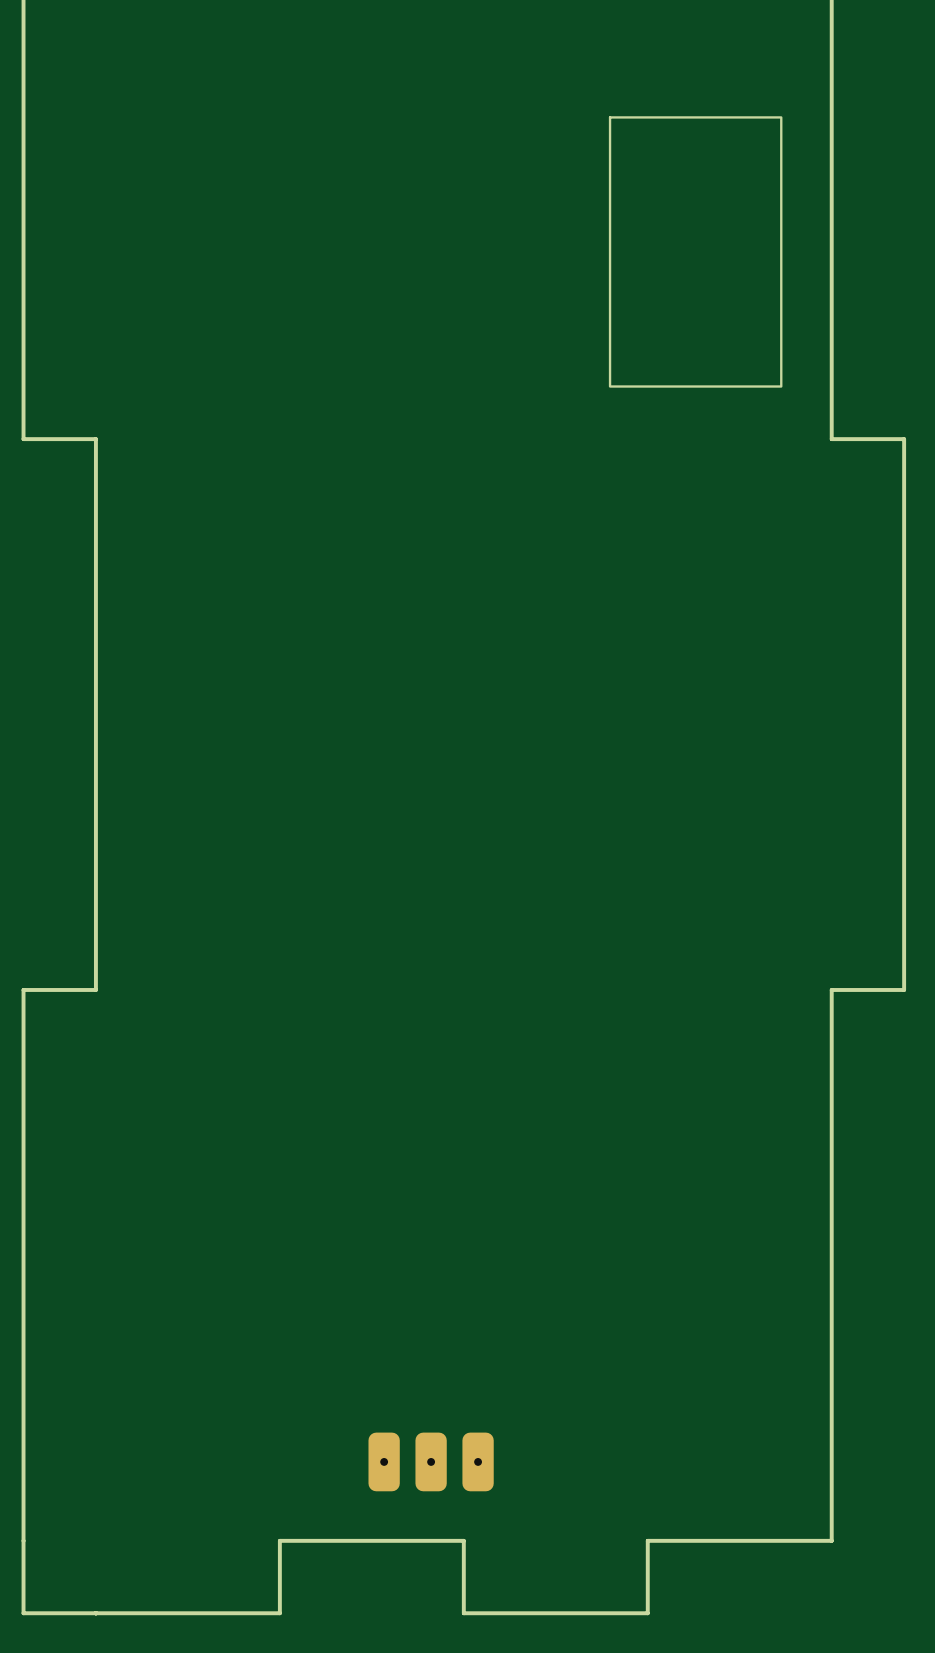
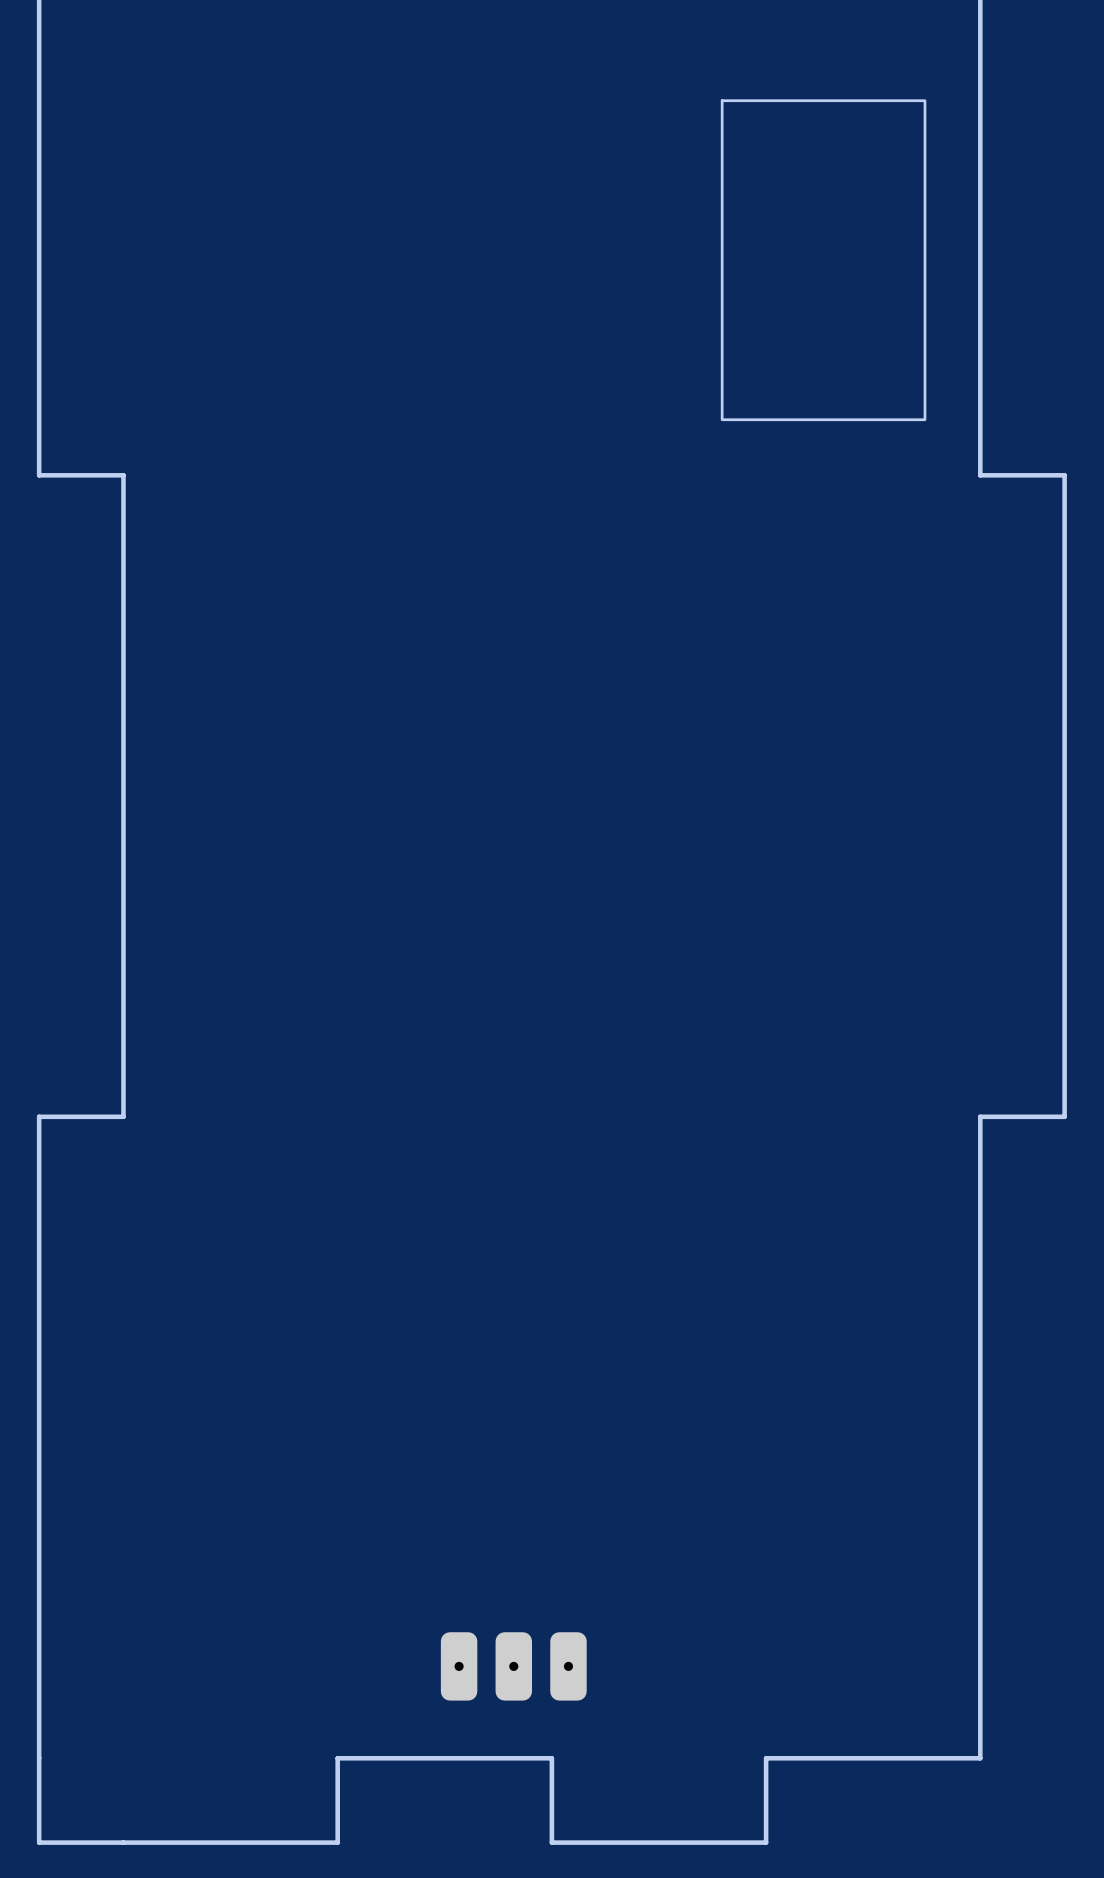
part footprint: [608, 116, 783, 388] -> [720, 99, 927, 422]

